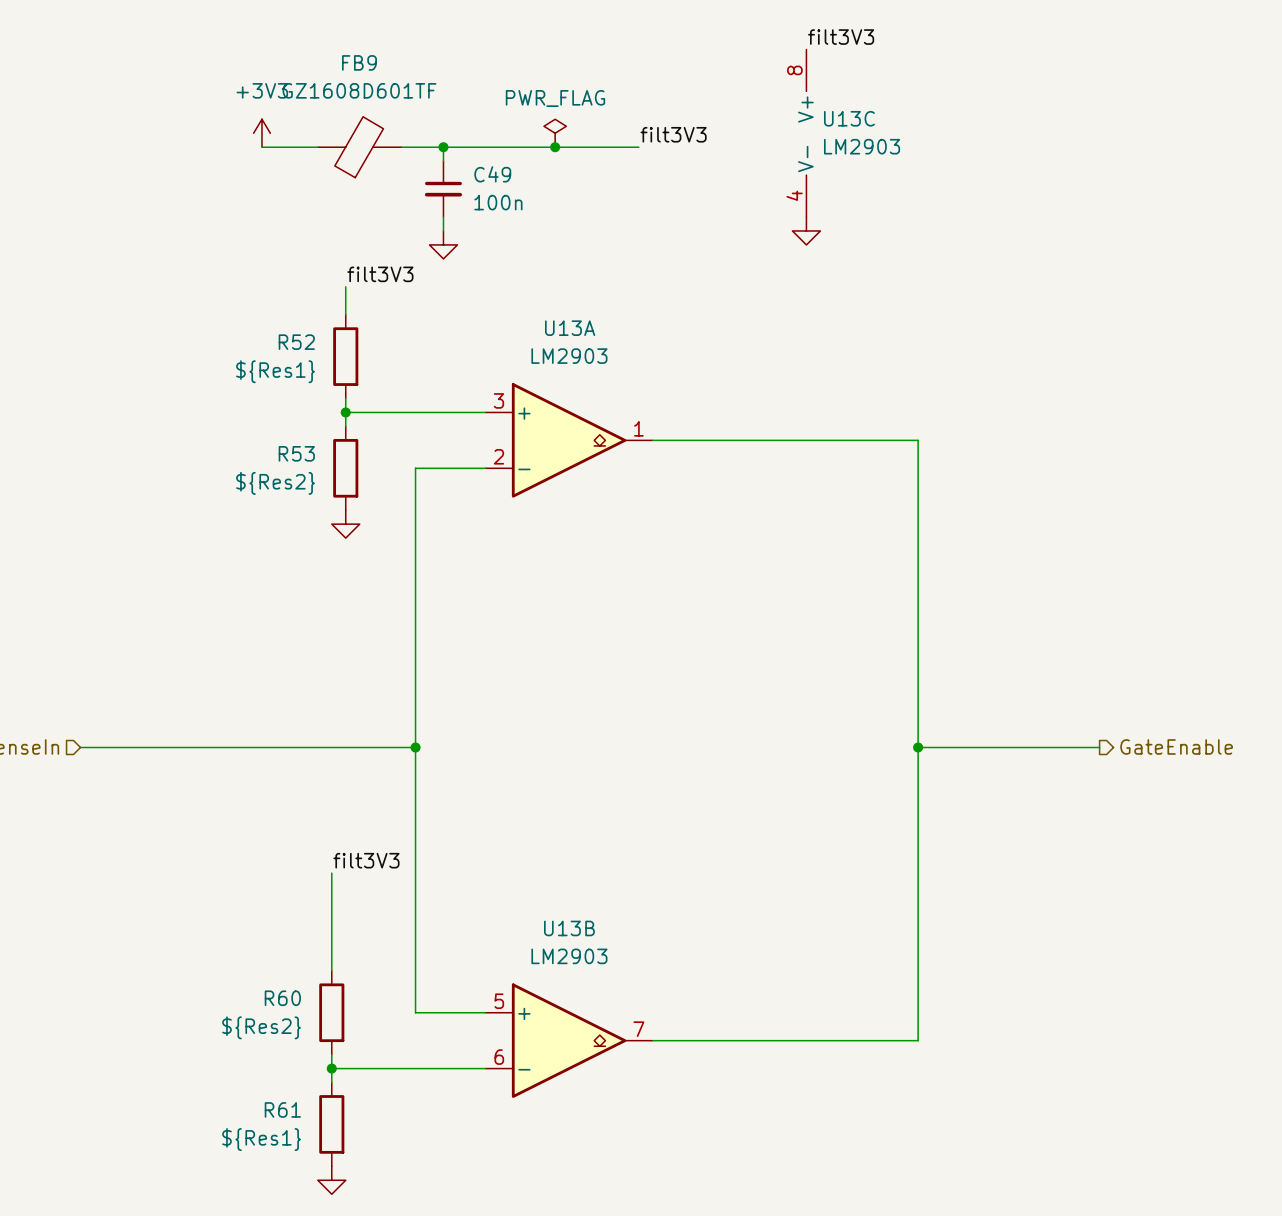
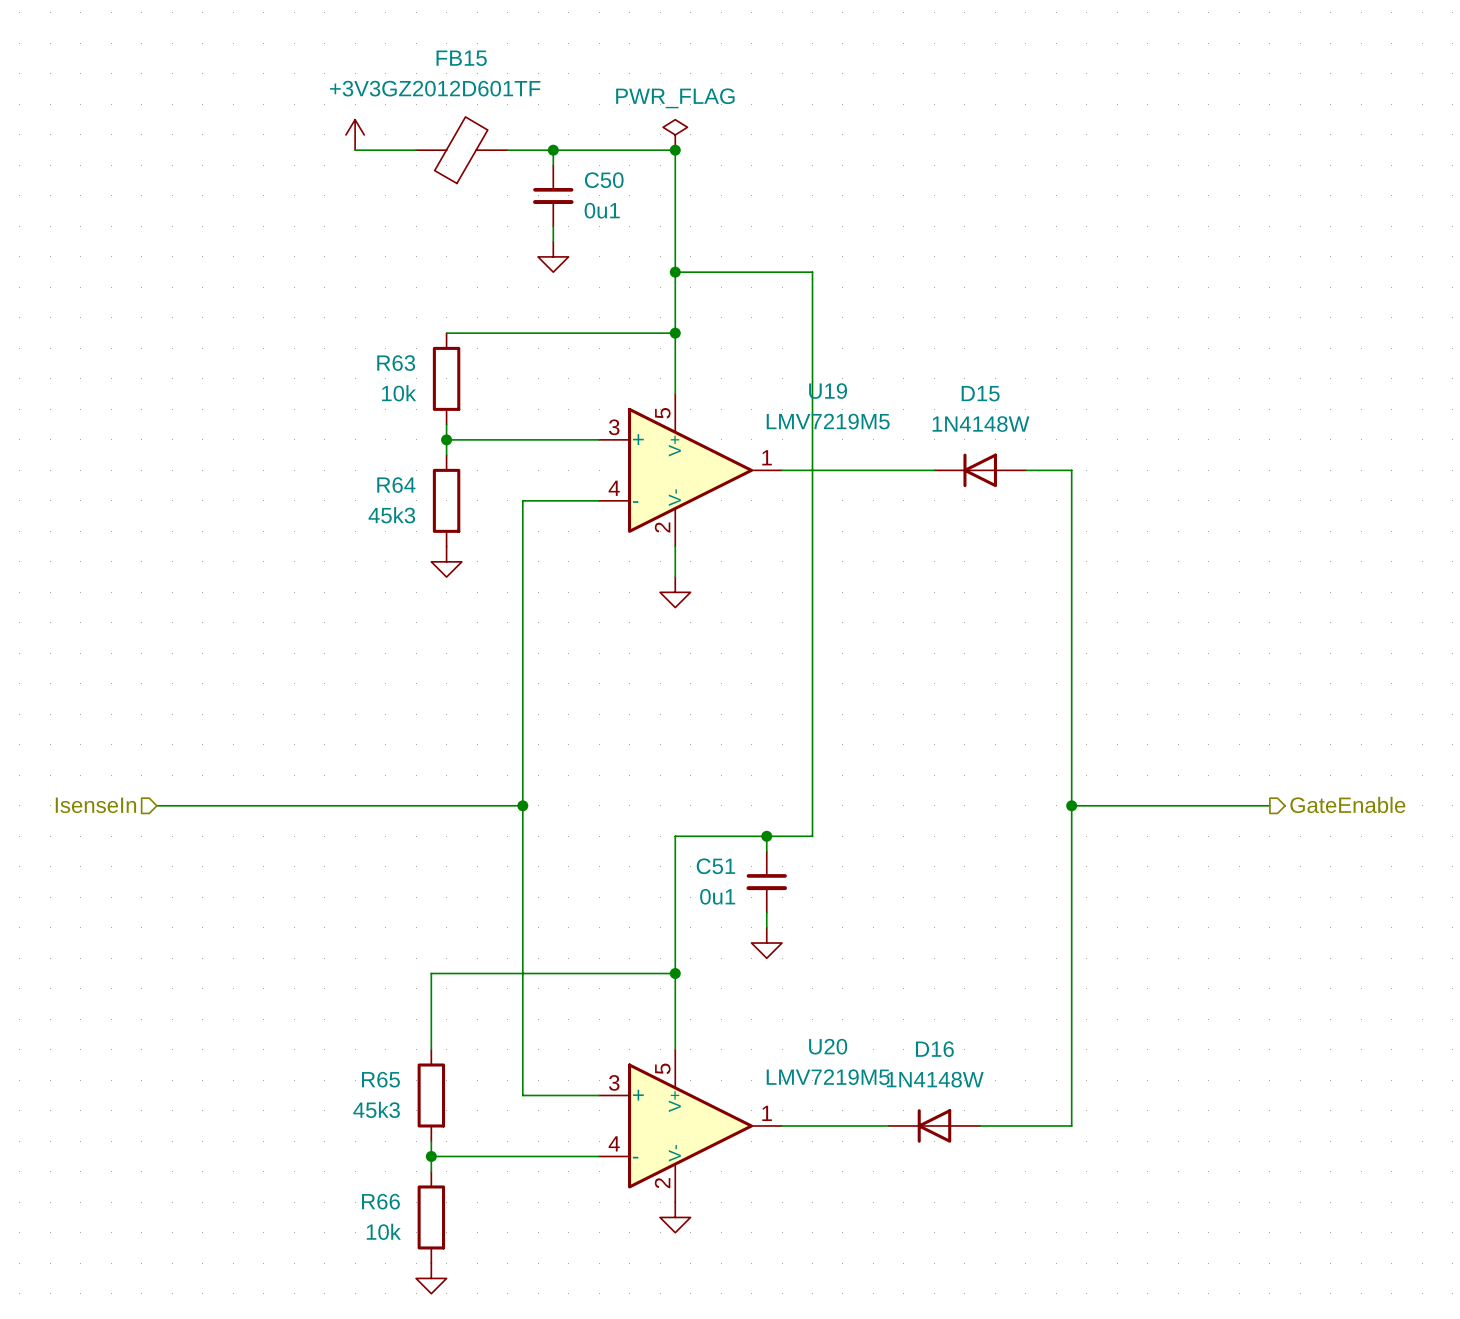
label: filt3V3 (841, 37) -> none
FB9 name: FB9 (359, 62) -> FB15 (461, 58)
FB9 value: GZ1608D601TF (359, 90) -> GZ2012D601TF (461, 88)
U13C: LM2903 (806, 133) -> none
label: filt3V3 (673, 134) -> none
wire: (555, 147) (638, 147) -> (675, 150) (675, 394)
C49 name: C49 (492, 174) -> C50 (604, 180)
C49 value: 100n (498, 202) -> 0u1 (602, 210)
power symbol: (806, 230) -> none
wire: none -> (675, 272) (812, 272) (812, 836) (675, 836) (675, 1049)
junction: none -> (675, 272)
label: filt3V3 (380, 274) -> none
wire: (345, 286) (345, 314) -> (675, 333) (446, 333)
junction: none -> (675, 333)
R52 name: R52 (296, 342) -> R63 (396, 363)
R52 value: ${Res1} (275, 371) -> 10k (399, 393)
U13A: LM2903 (569, 440) -> none
U19: none -> LMV7219M5 (690, 470)
D15: none -> 1N4148W (980, 470)
R53 name: R53 (296, 453) -> R64 (396, 485)
R53 value: ${Res2} (275, 483) -> 45k3 (391, 515)
wire: none -> (675, 546) (675, 577)
power symbol: none -> (675, 592)
wire: none -> (766, 836) (766, 851)
junction: none -> (766, 836)
C51: none -> 0u1 (766, 882)
wire: none -> (766, 912) (766, 927)
label: filt3V3 (366, 860) -> none
wire: (331, 873) (331, 901) -> (675, 973) (431, 973)
power symbol: none -> (766, 943)
junction: none -> (675, 973)
R60 name: R60 (282, 998) -> R65 (380, 1079)
R60 value: ${Res2} (261, 1027) -> 45k3 (376, 1109)
U13B: LM2903 (569, 1040) -> none
U20: none -> LMV7219M5 (690, 1125)
D16: none -> 1N4148W (934, 1125)
R61 name: R61 (282, 1109) -> R66 (380, 1201)
power symbol: none -> (675, 1217)
R61 value: ${Res1} (261, 1139) -> 10k (383, 1231)

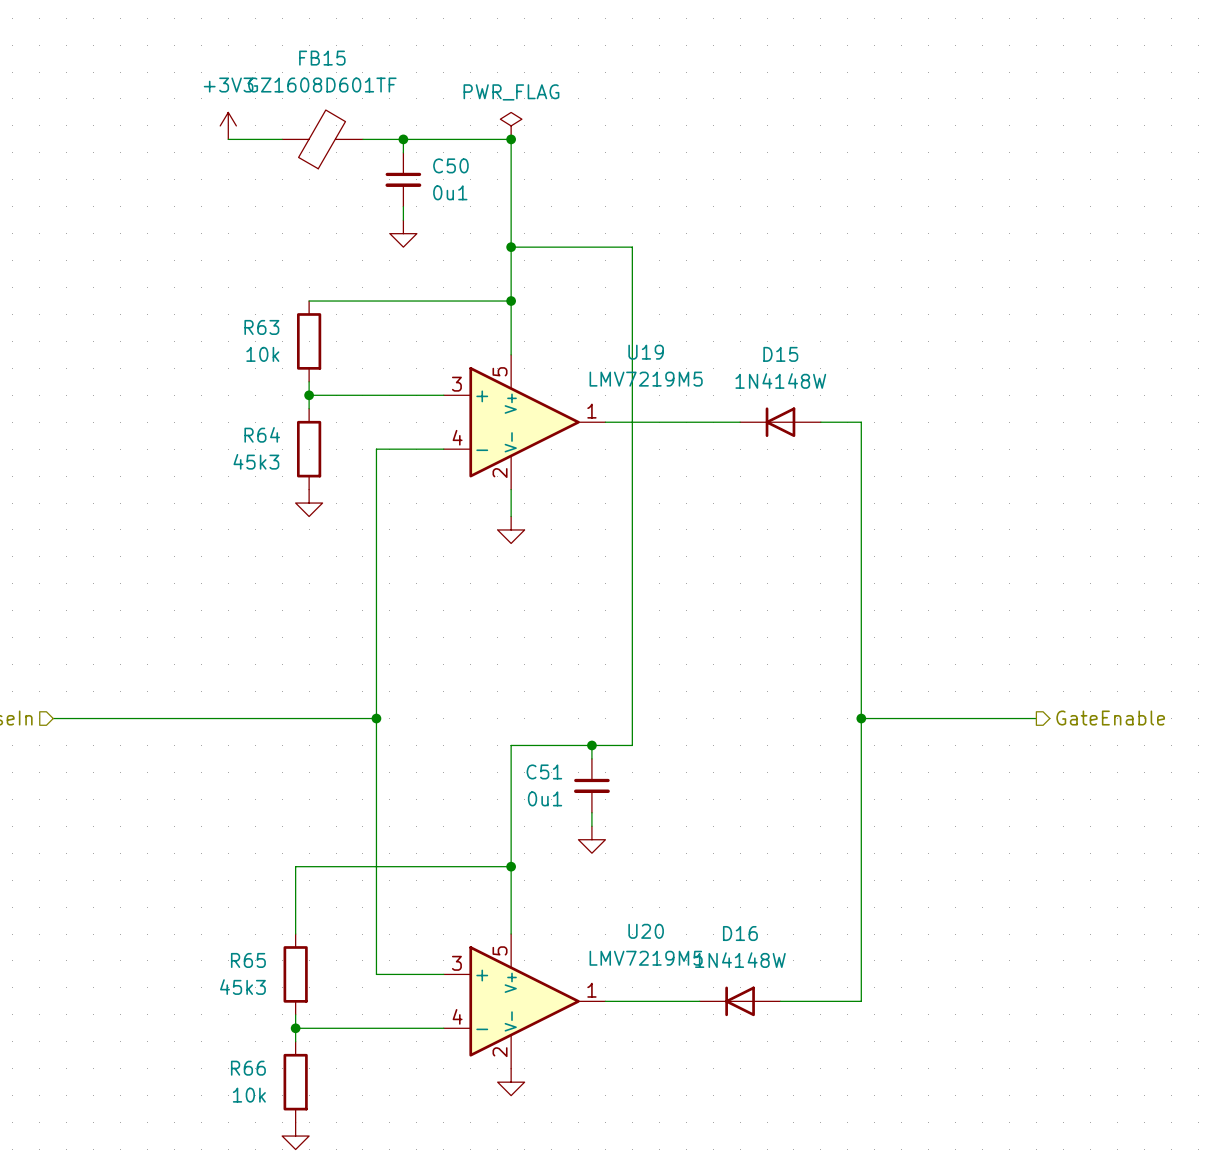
FB15 value: GZ2012D601TF (461, 88) -> GZ1608D601TF (322, 85)

